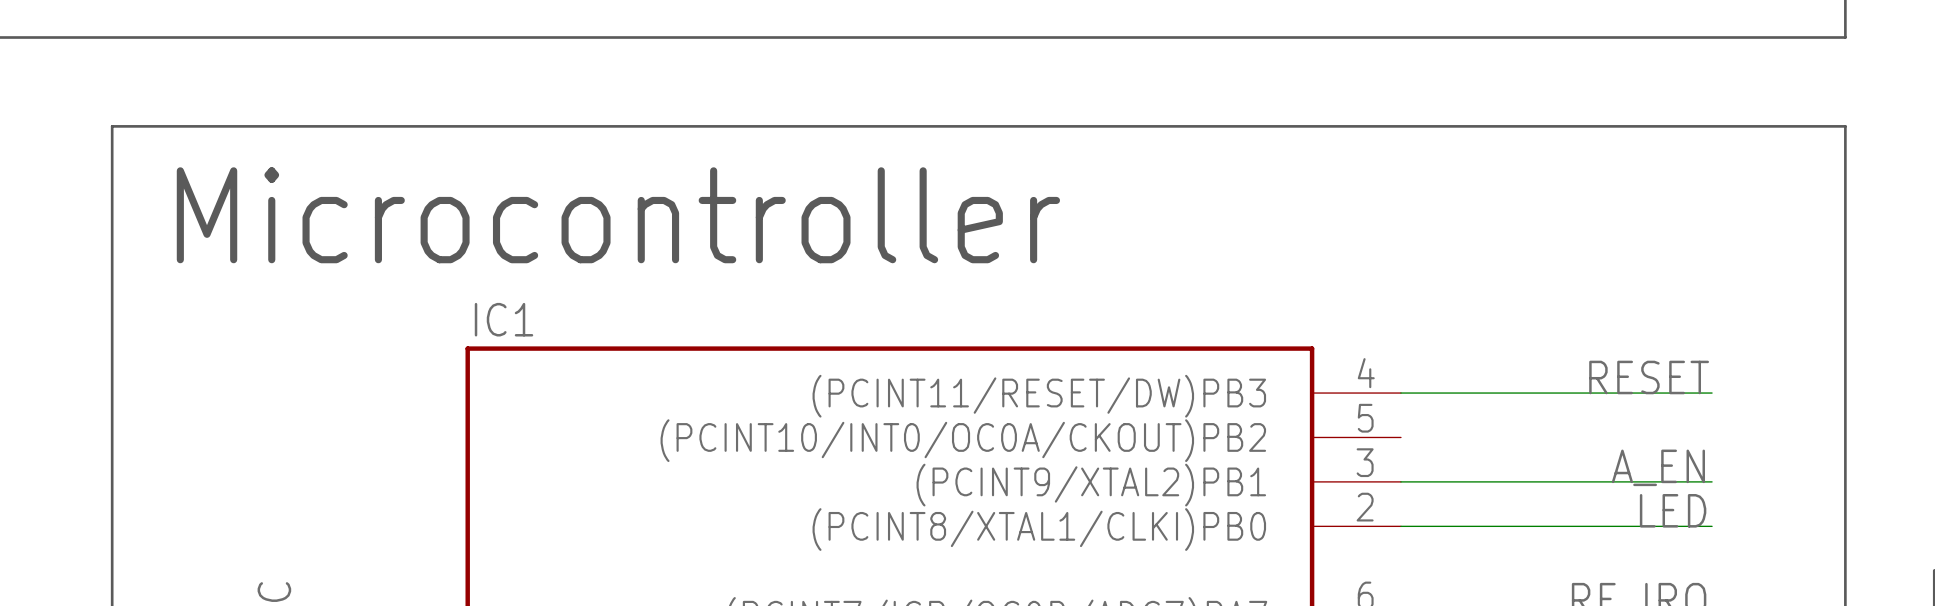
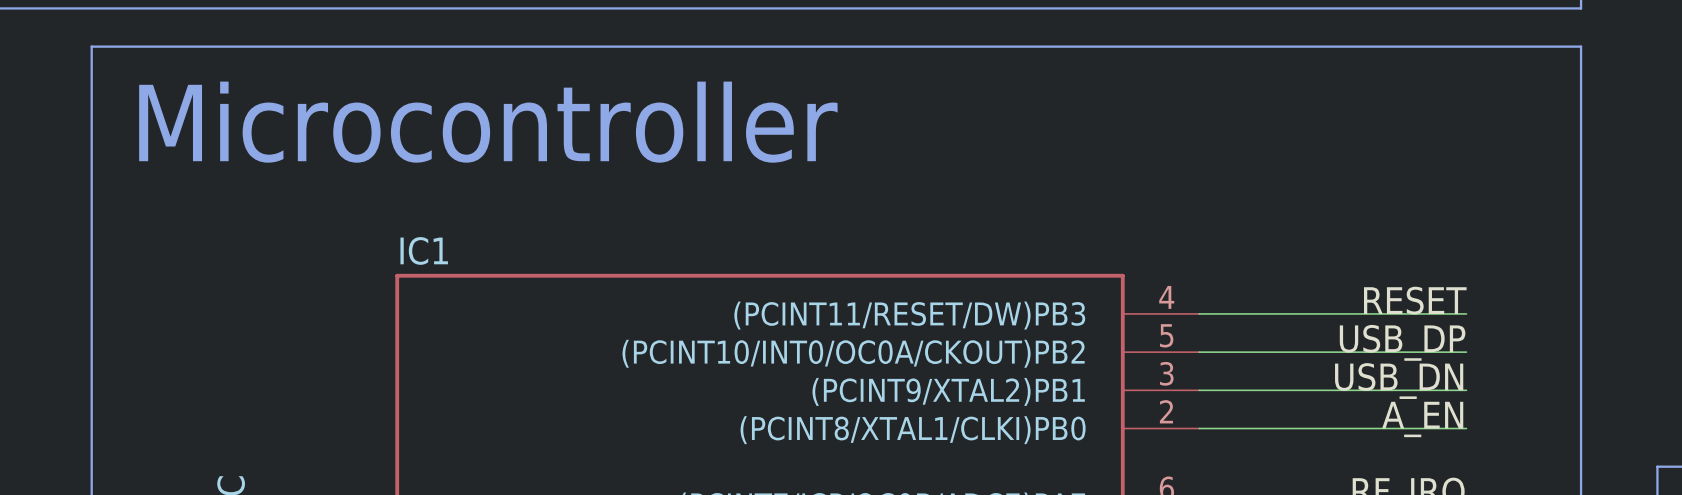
line: (112, 126) (1845, 126) -> (91, 84) (91, 46) (1581, 46) (1581, 84)
text position: Microcontroller (618, 215) -> Microcontroller (488, 122)
label: none -> USB_DP (1402, 342)
wire: none -> (1199, 352) (1466, 352)
label: A_EN (1658, 467) -> USB_DN (1399, 381)
label: LED (1673, 510) -> A_EN (1422, 419)

